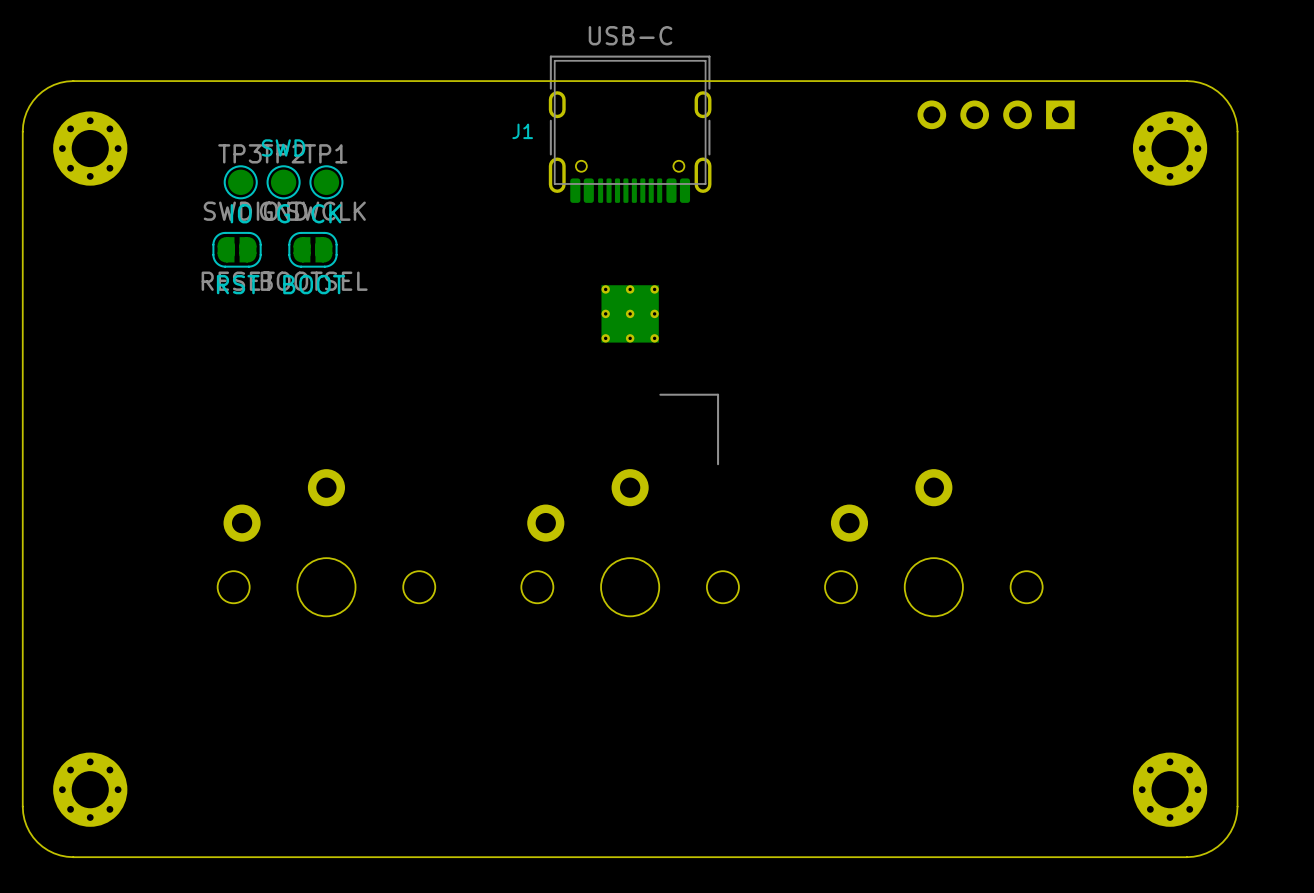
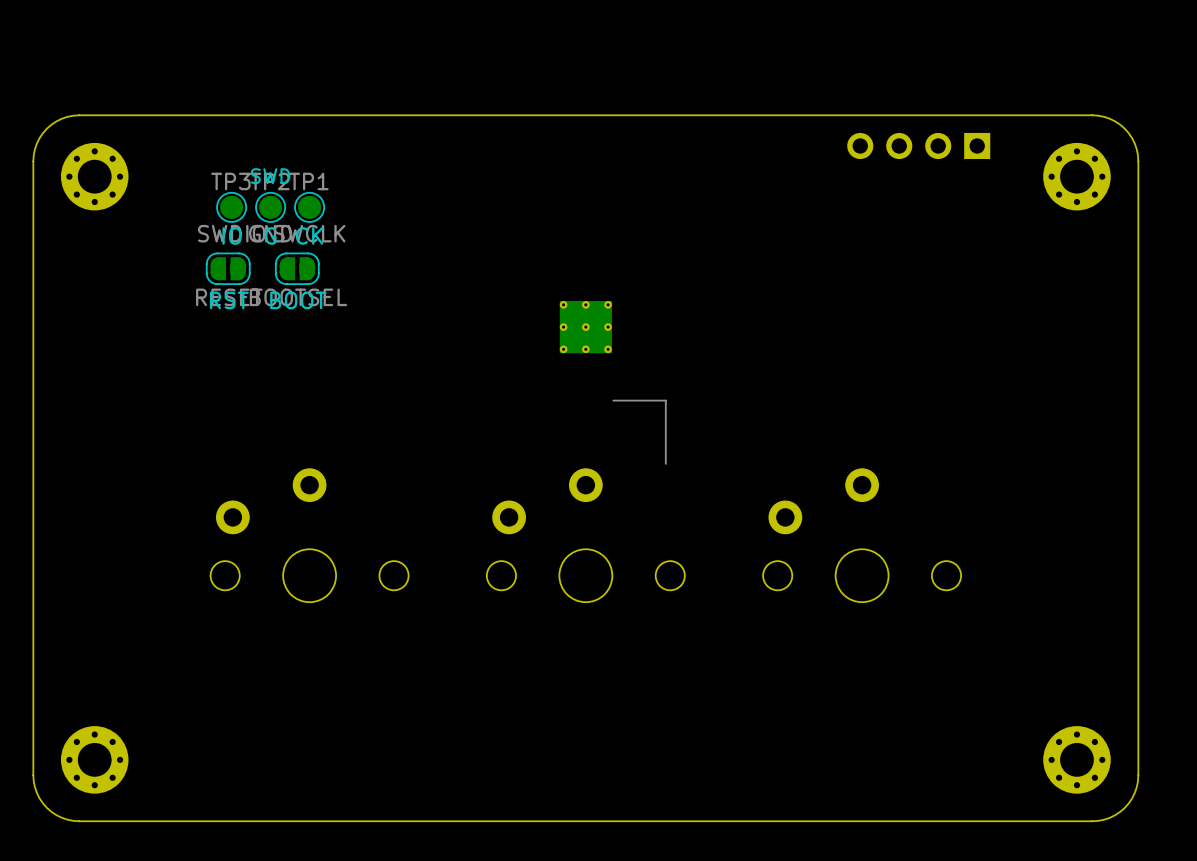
J1: USB-C (630, 129) -> none

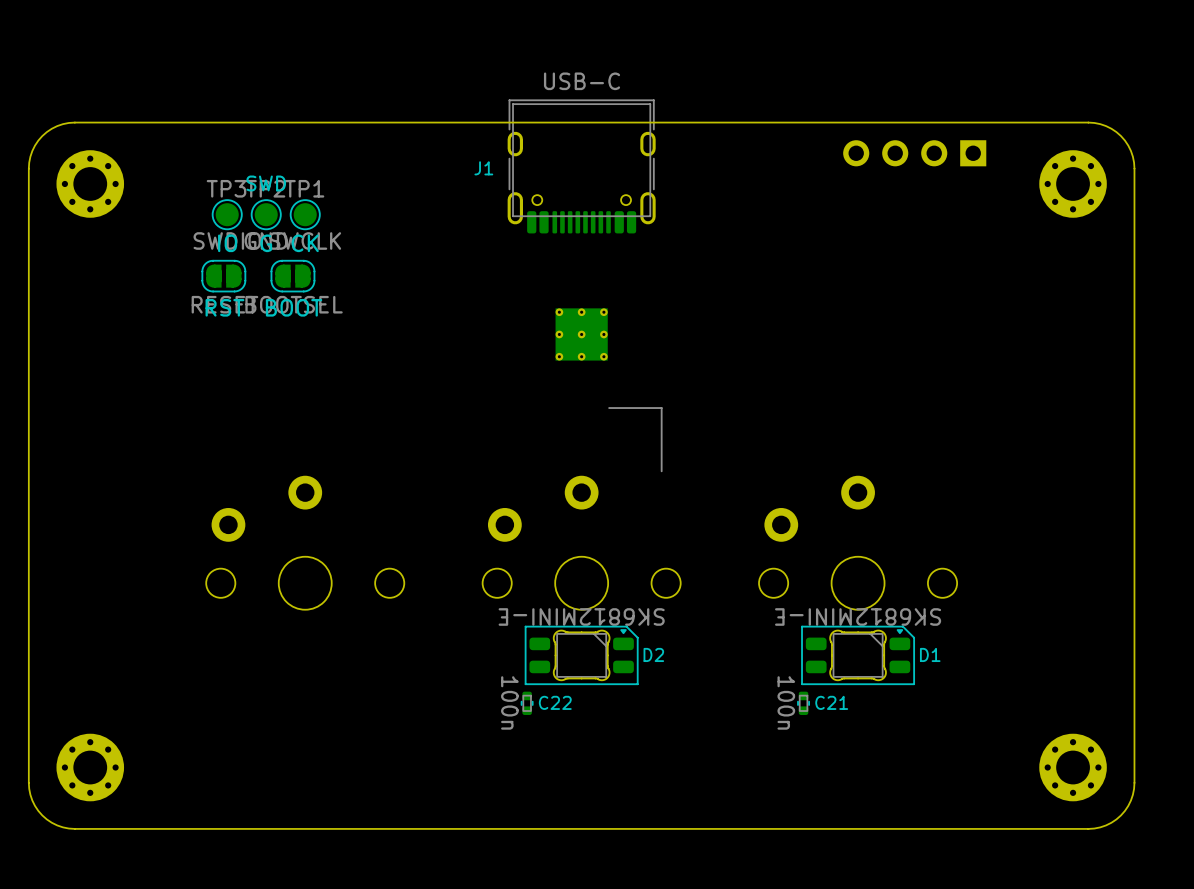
J1: none -> USB-C (581, 166)
D2: none -> SK6812MINI-E (581, 655)
D1: none -> SK6812MINI-E (858, 655)
C22: none -> 100n (527, 703)
C21: none -> 100n (803, 703)

